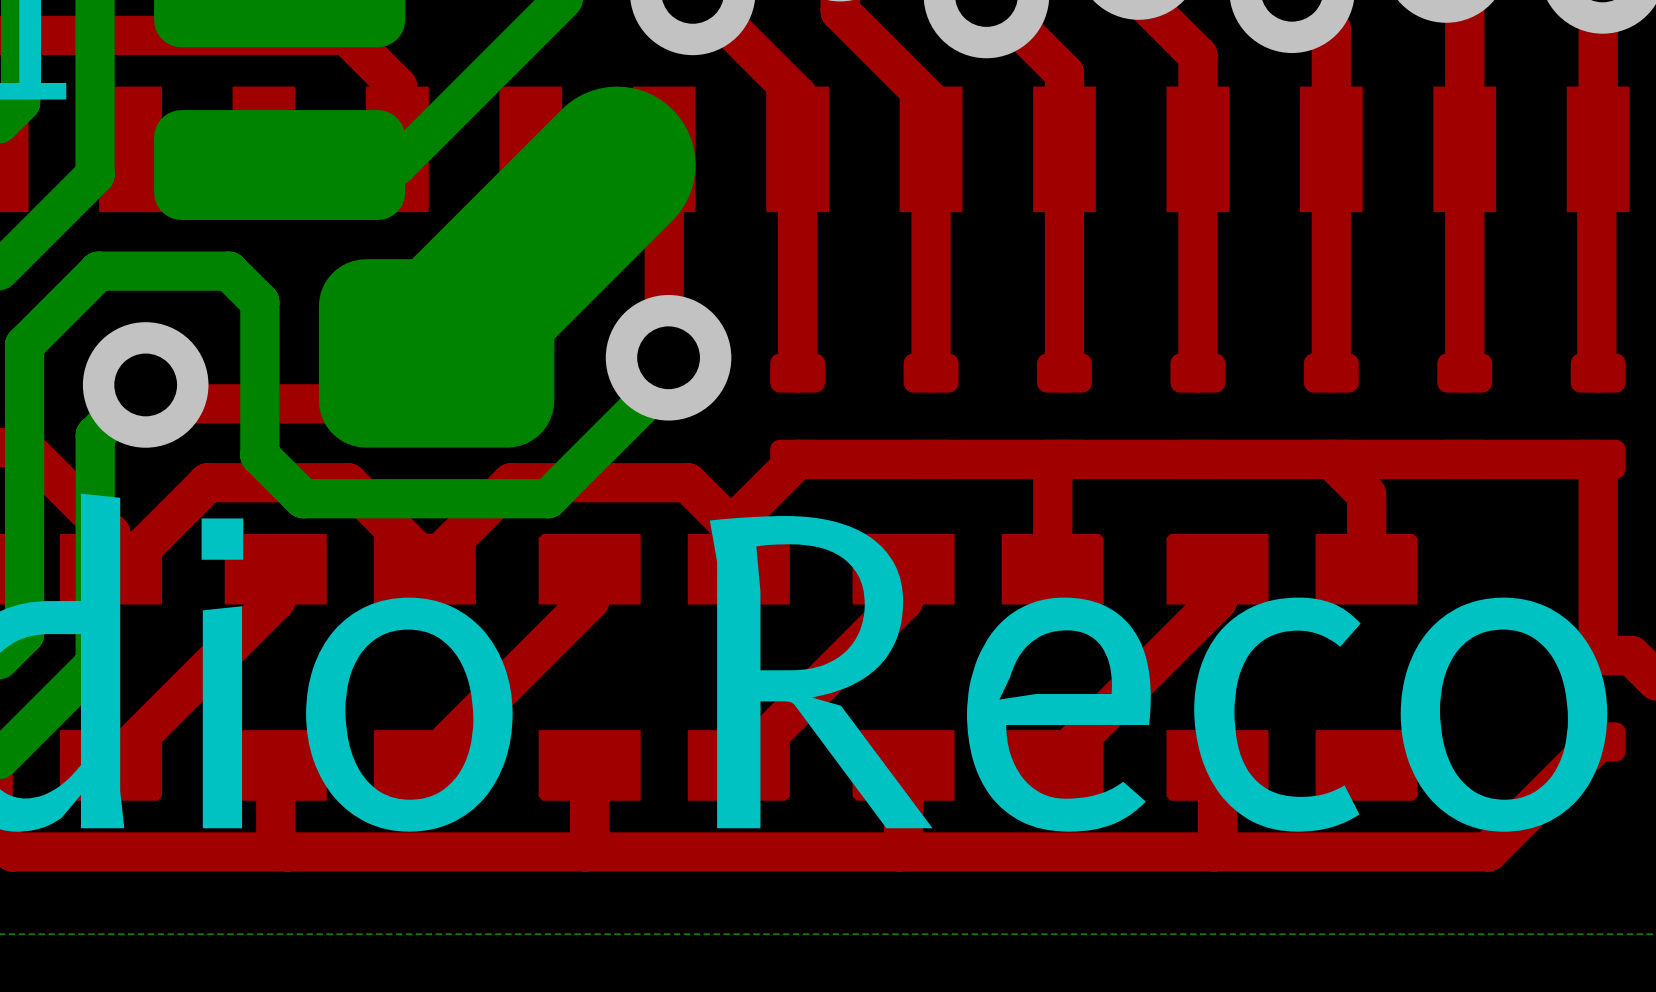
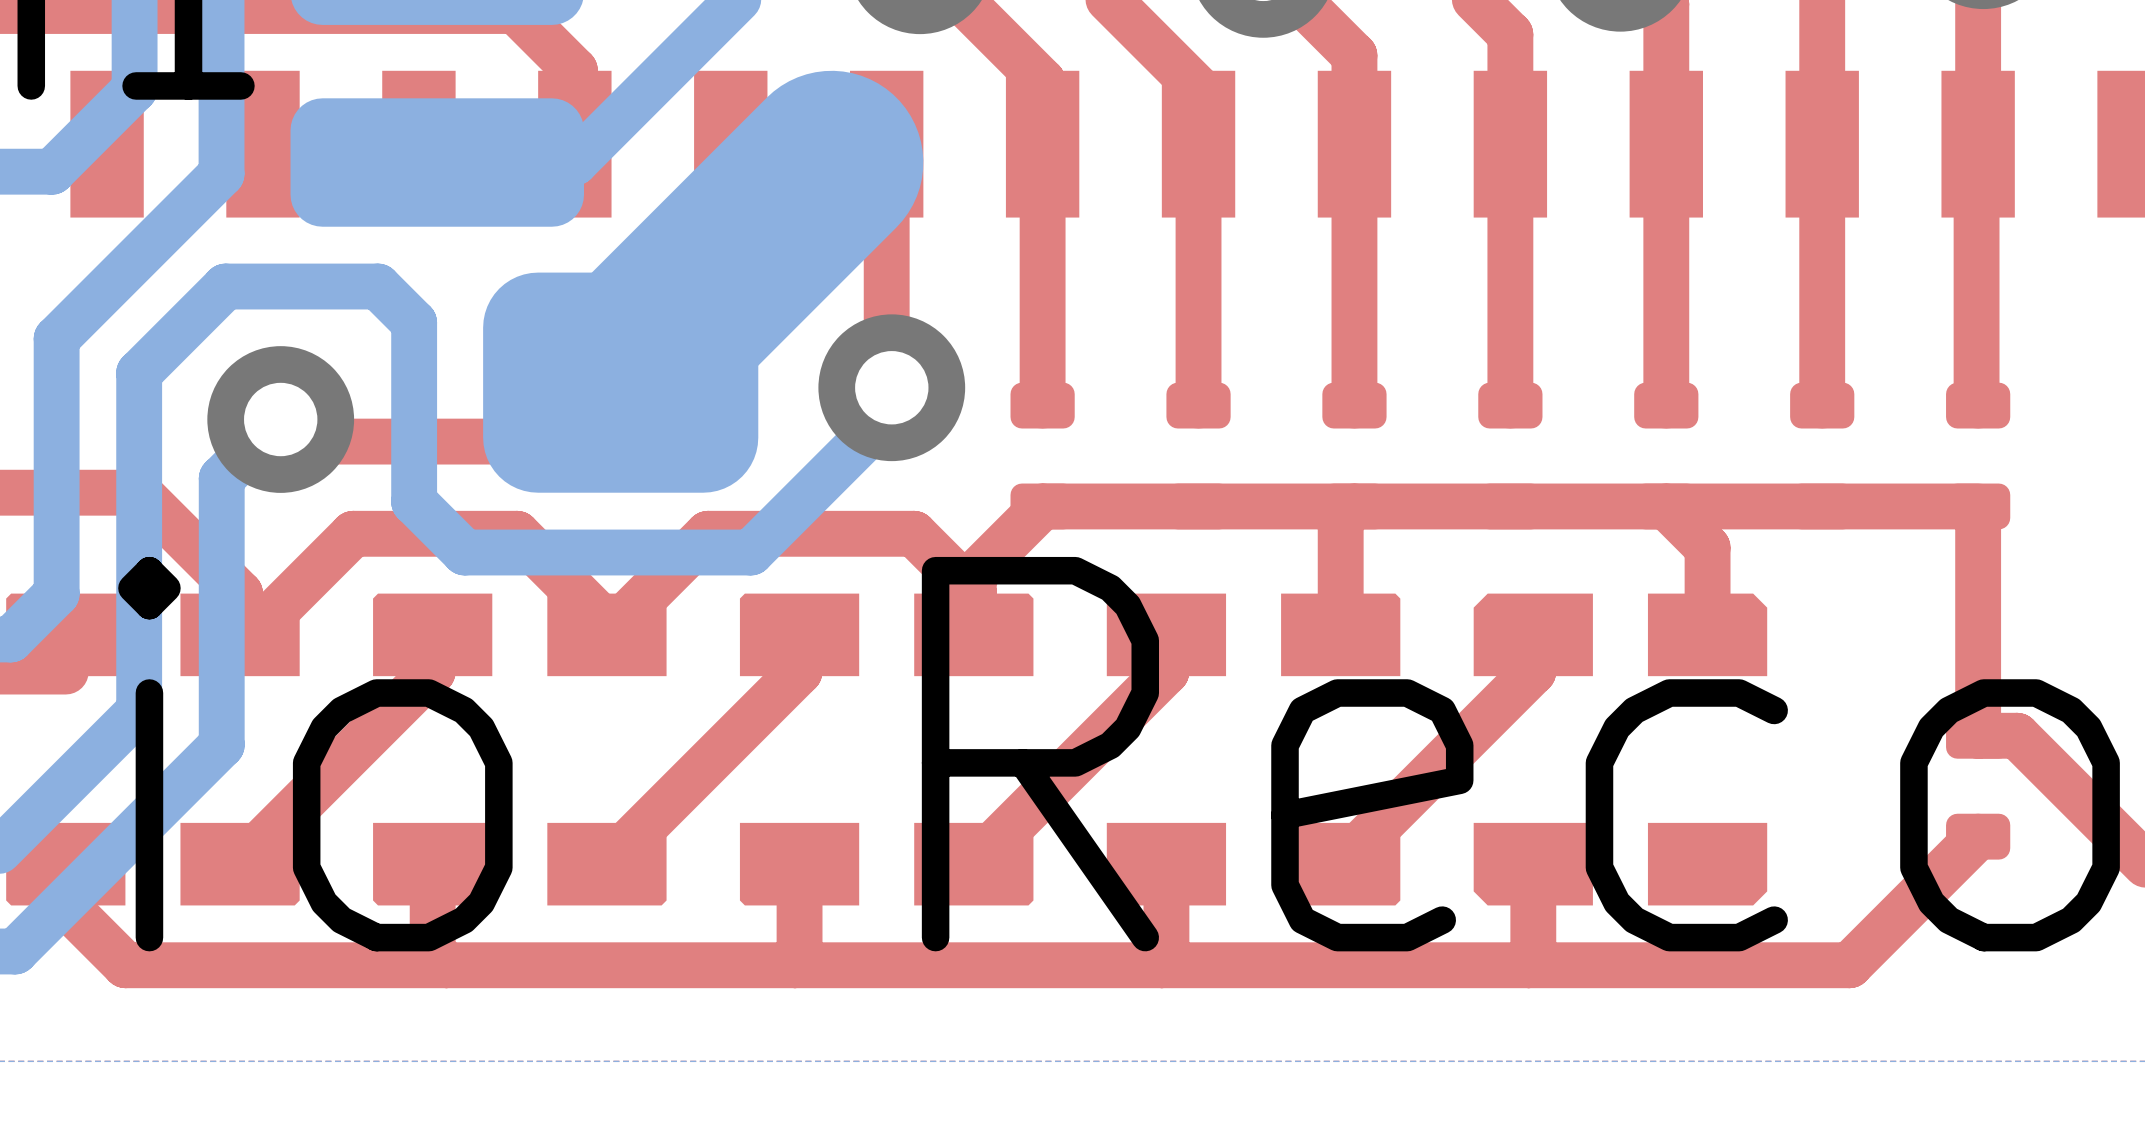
part footprint: [1166, 533, 1418, 801] -> [1473, 593, 1768, 906]

